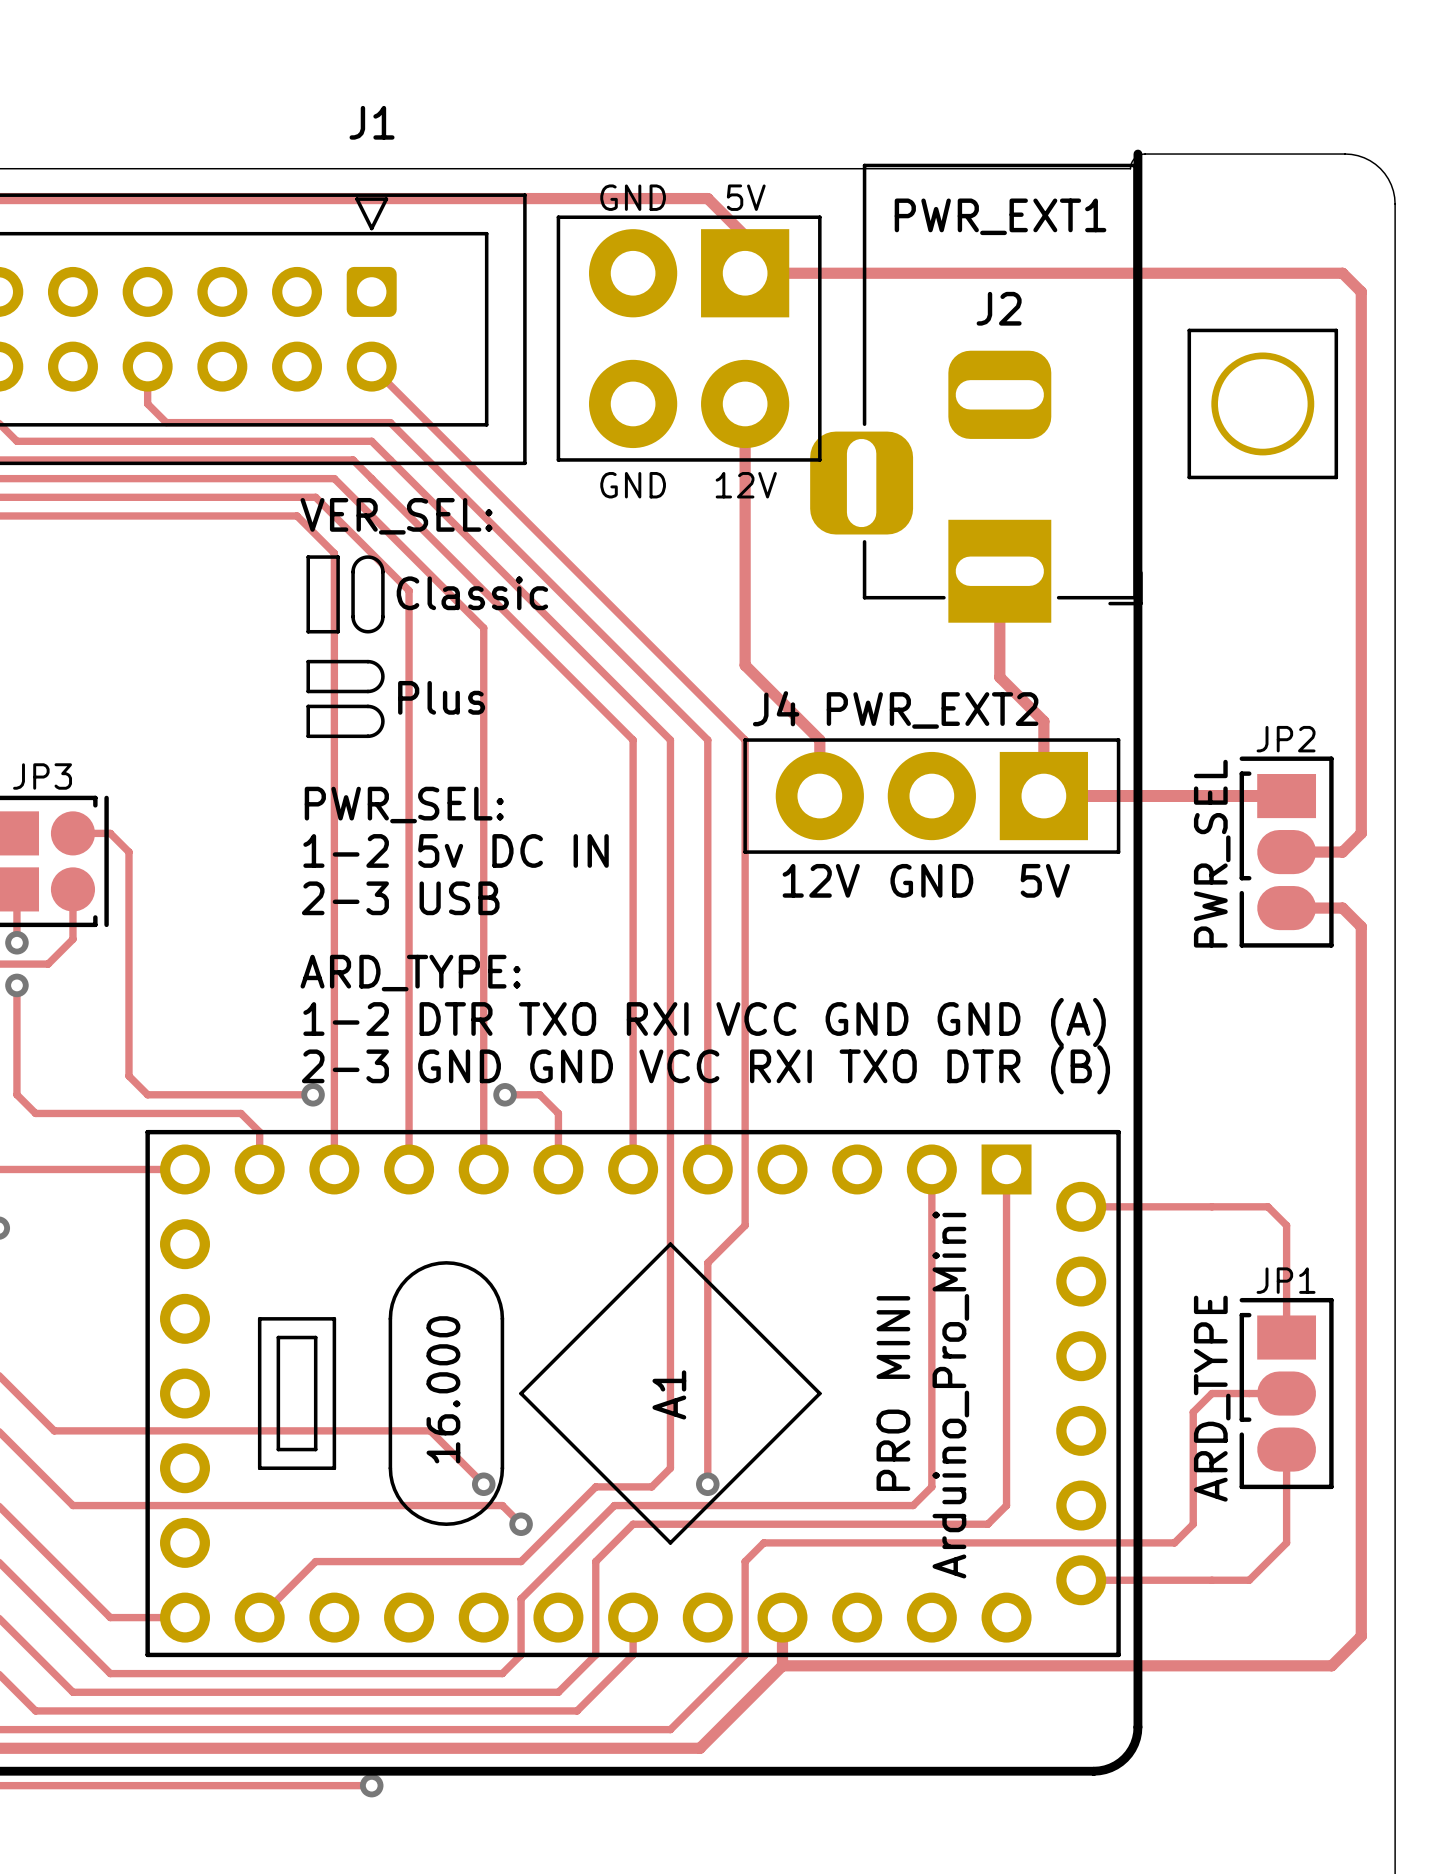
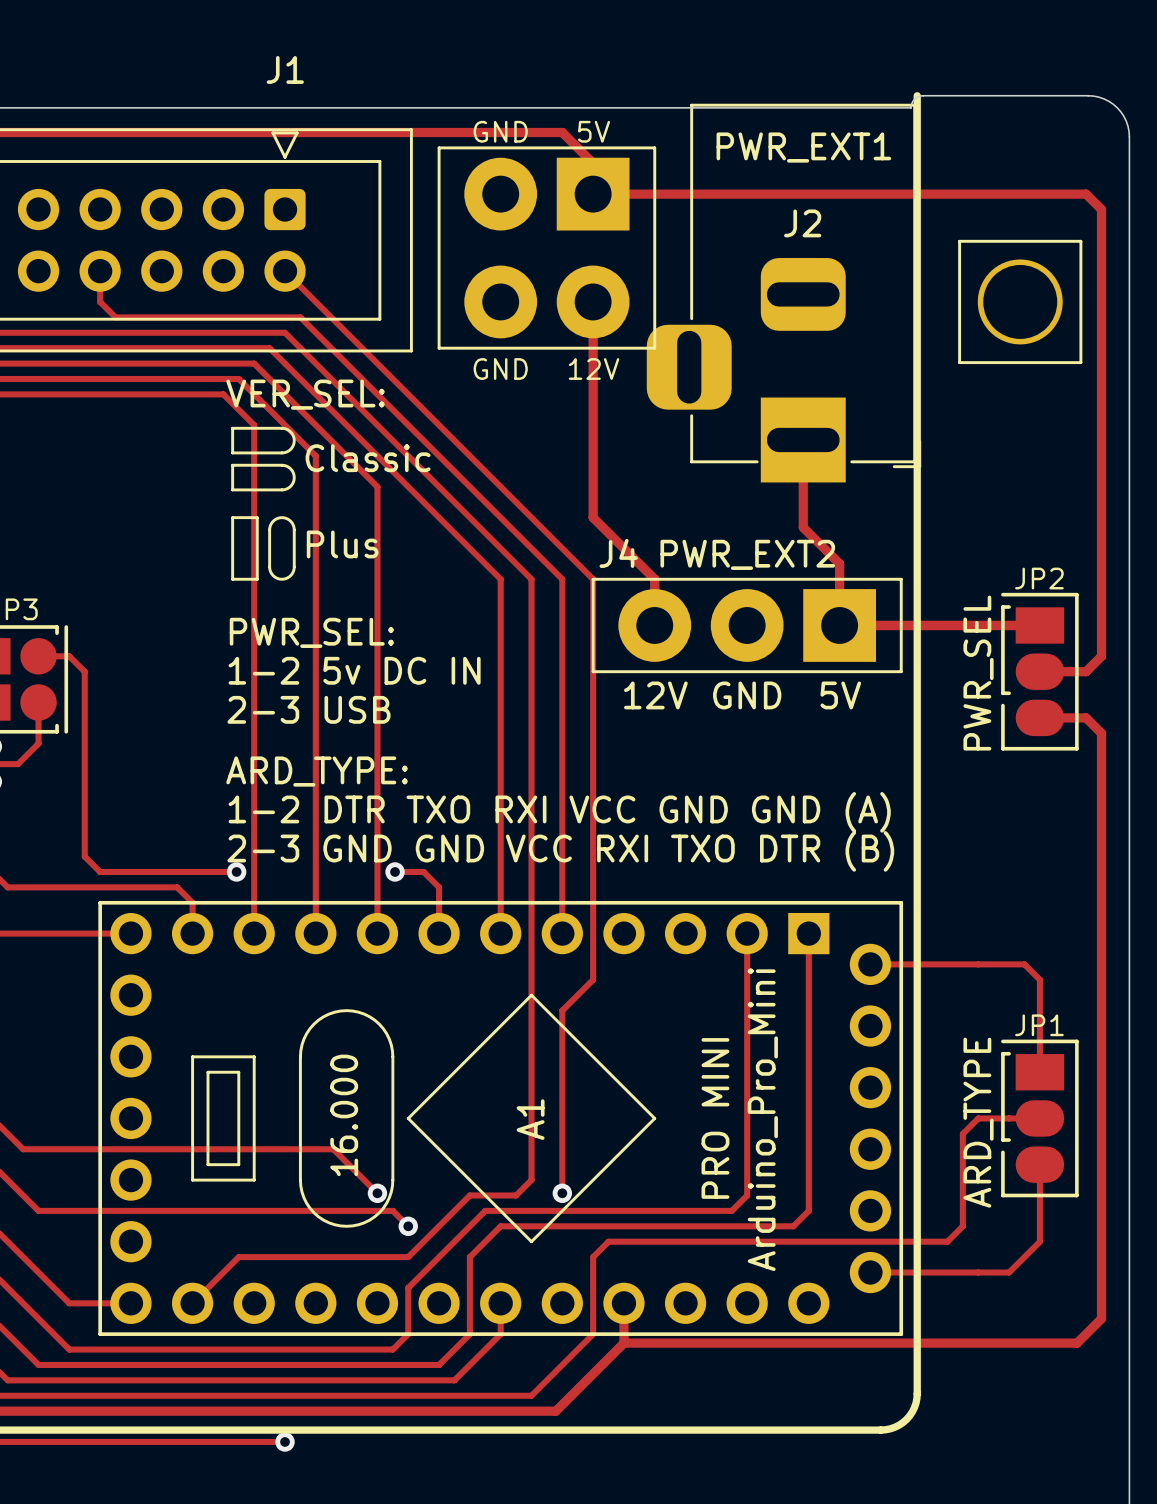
line: (338, 557) (338, 631) -> (257, 428) (288, 429) (293, 437) (292, 446) (283, 452) (232, 452)
line: (353, 571) (353, 620) (360, 629) (371, 631) (378, 627) (382, 618) (382, 568) (375, 559) (366, 557) (356, 562) (353, 571) -> (269, 529) (270, 570) (275, 577) (285, 578) (290, 575) (294, 568) (293, 526) (288, 519) (280, 517) (272, 522) (269, 529)
line: (308, 586) (308, 601) -> (257, 489) (288, 488) (293, 480) (292, 471) (283, 465) (232, 465)
line: (308, 665) (308, 661) (369, 661) (379, 667) (382, 676) (379, 685) (371, 690) (308, 691) -> (232, 551) (232, 539)
line: (308, 706) (371, 706) (379, 712) (382, 721) (379, 730) (371, 735) (308, 736) -> (232, 517) (257, 517) (257, 579) (232, 579) (232, 576)

